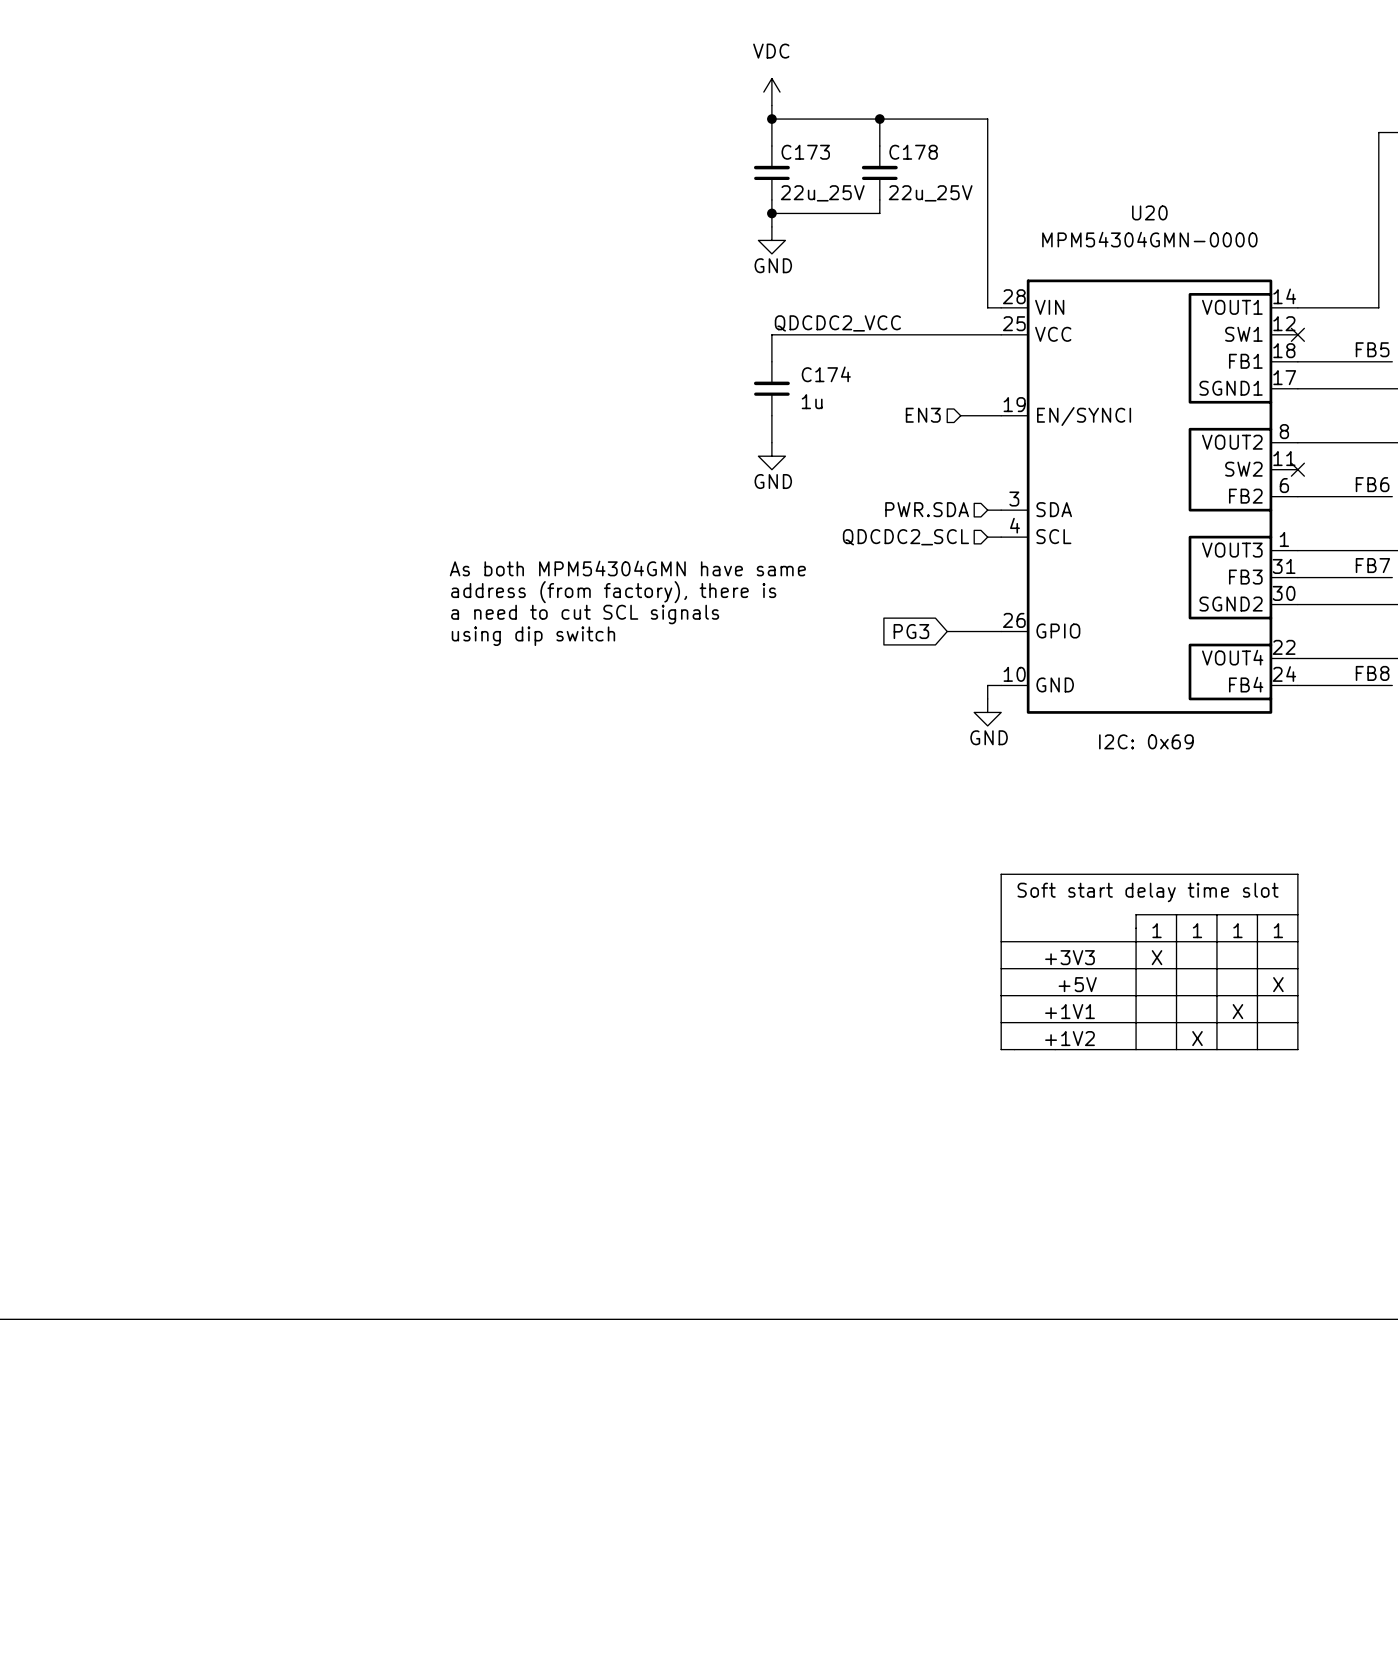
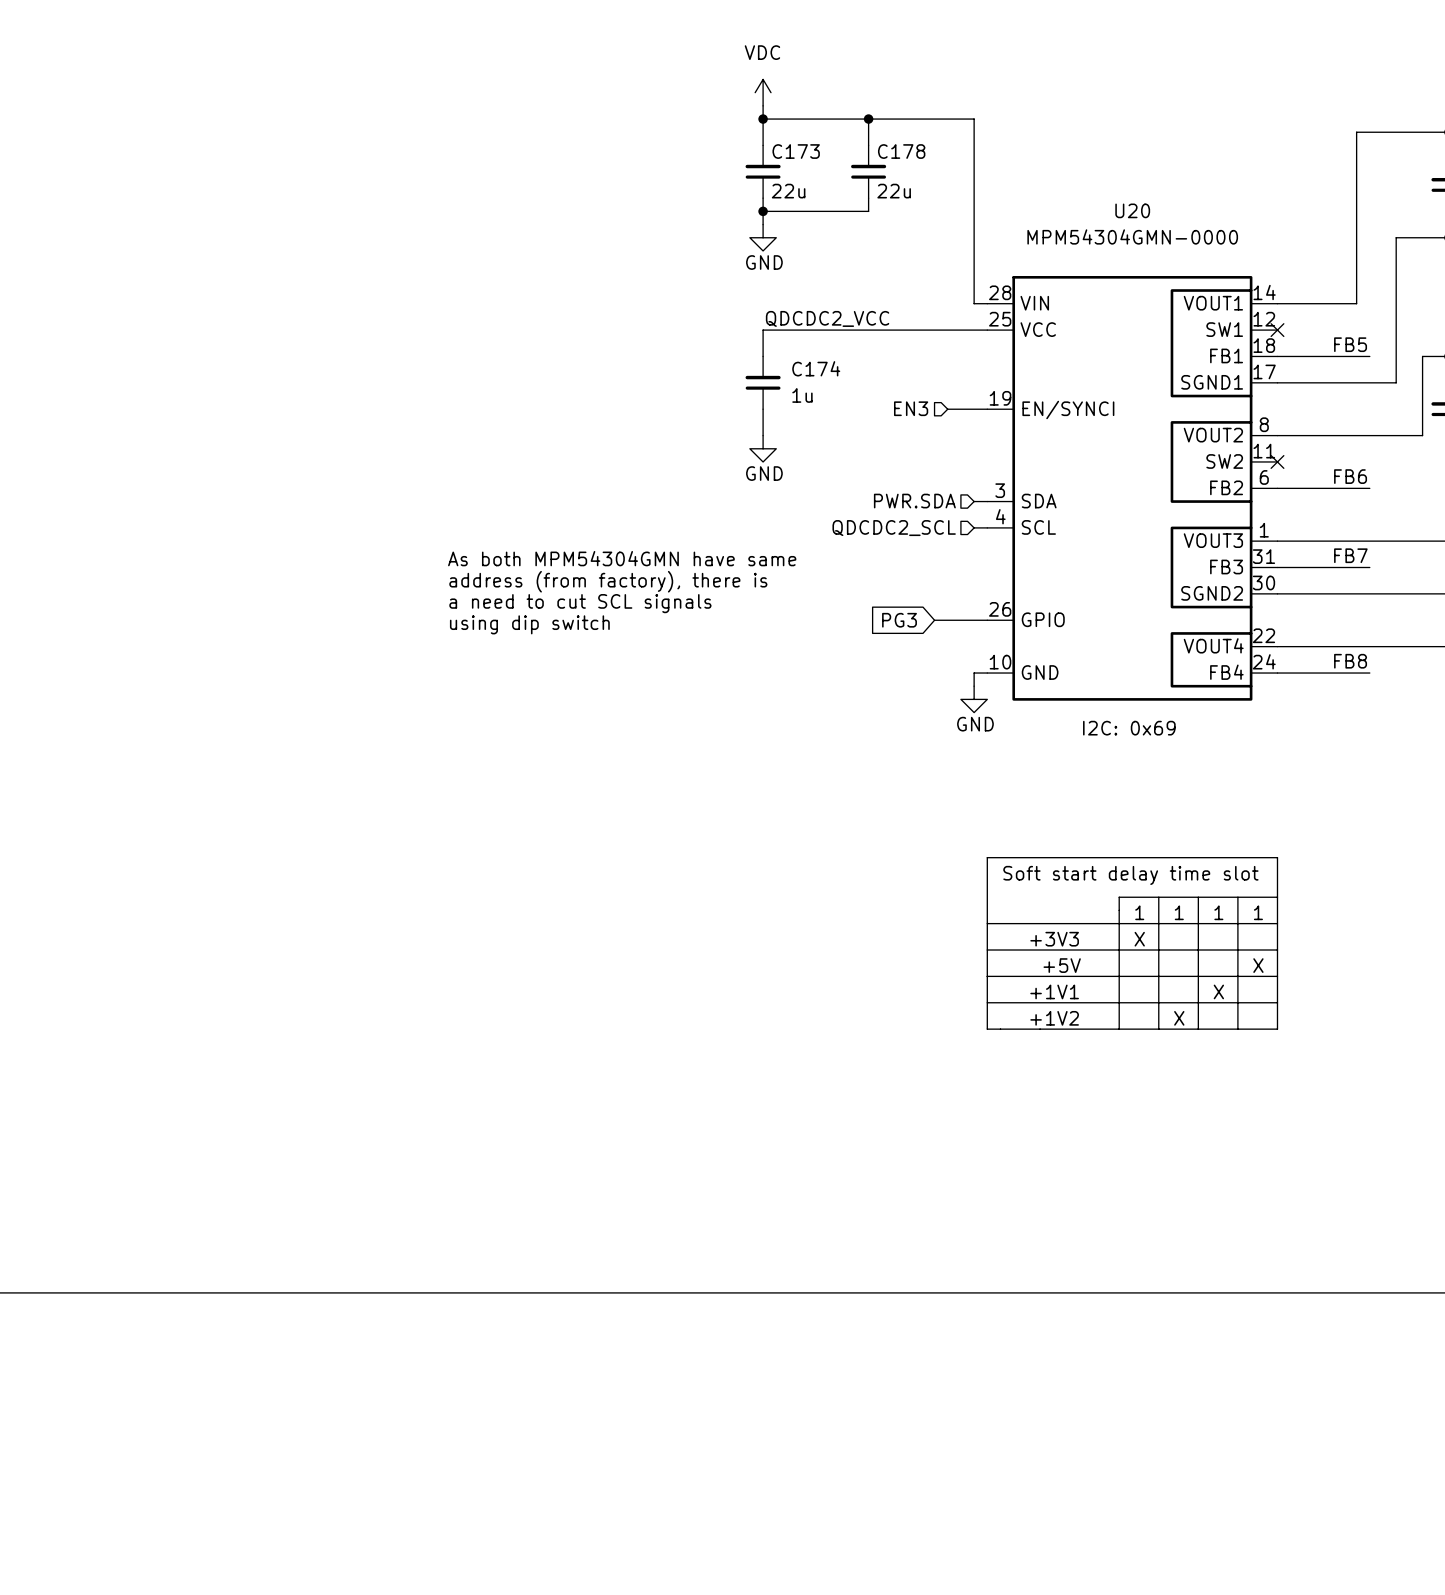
C173 text: 22u_25V (822, 193) -> 22u (788, 191)
C178 text: 22u_25V (930, 193) -> 22u (894, 191)

